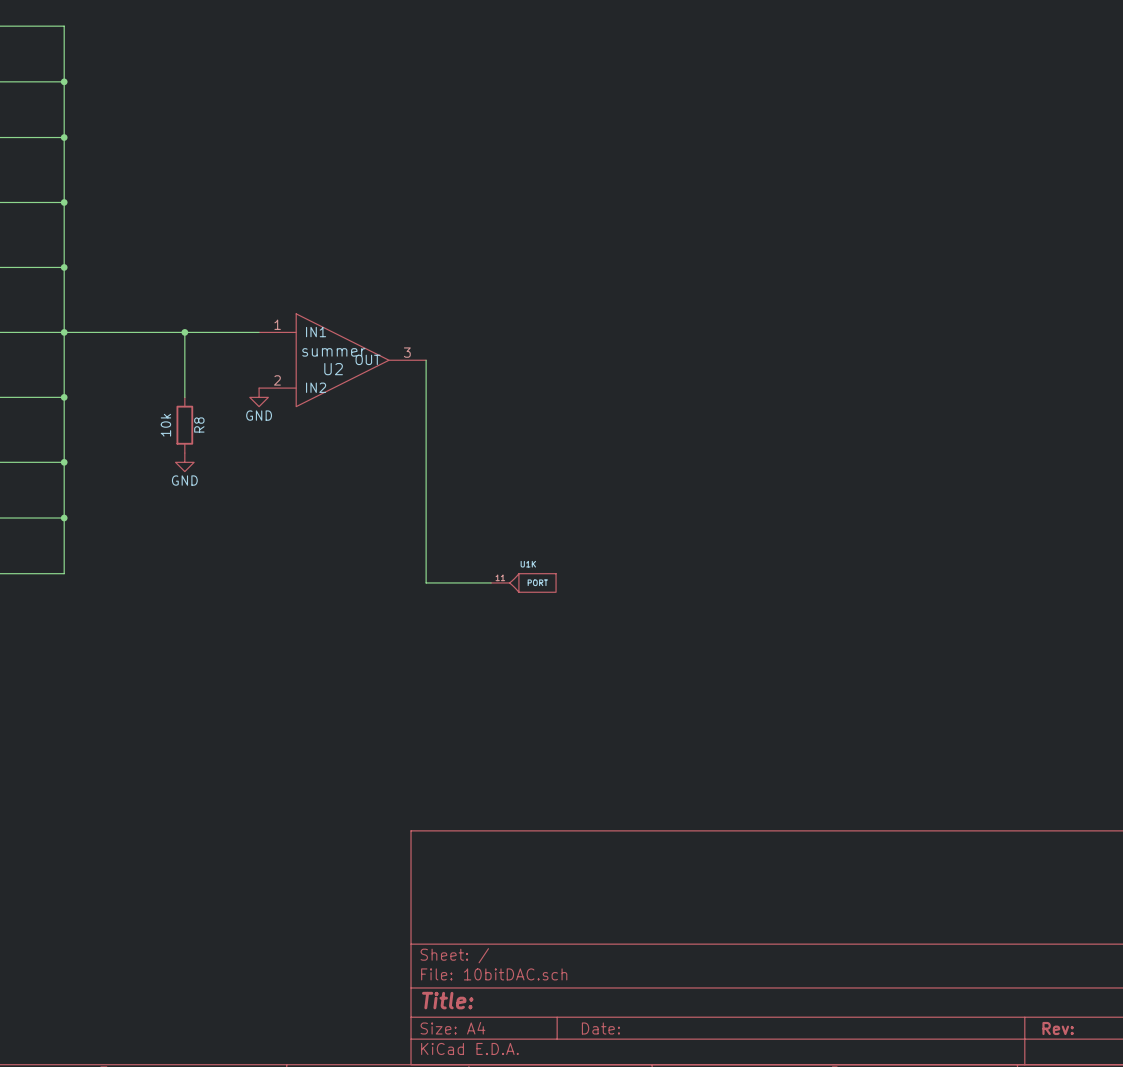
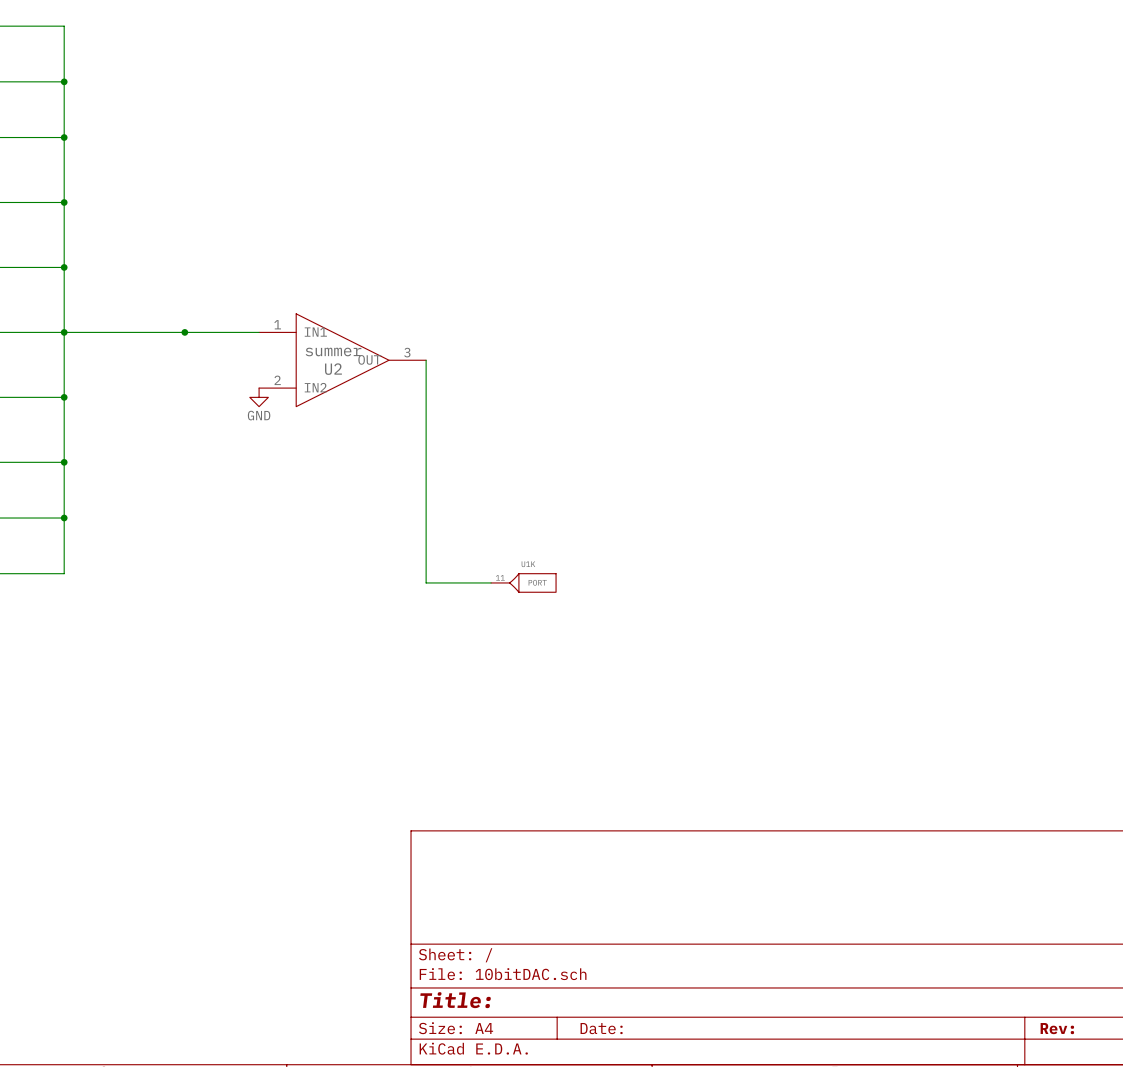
wire: (184, 332) (184, 397) -> none
R8: 10k (184, 425) -> none
power symbol: GND (184, 462) -> none

